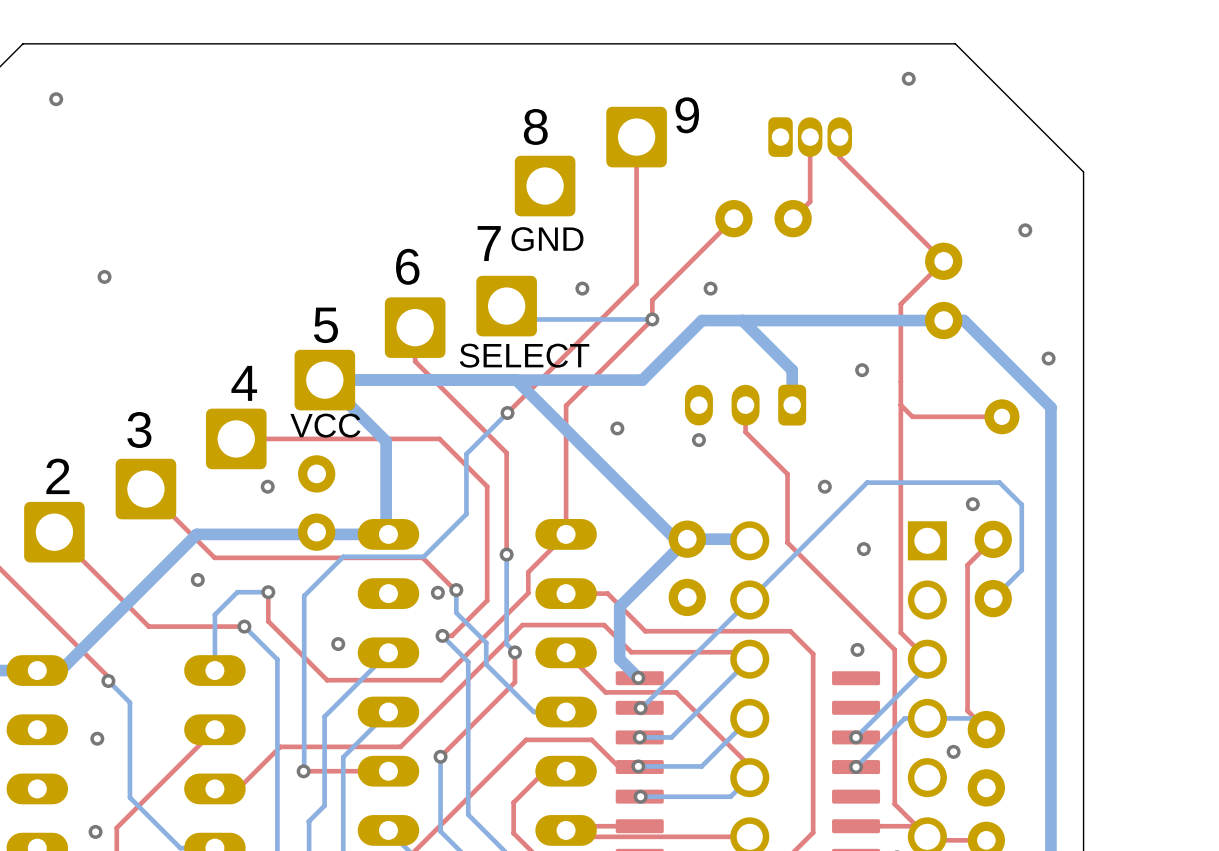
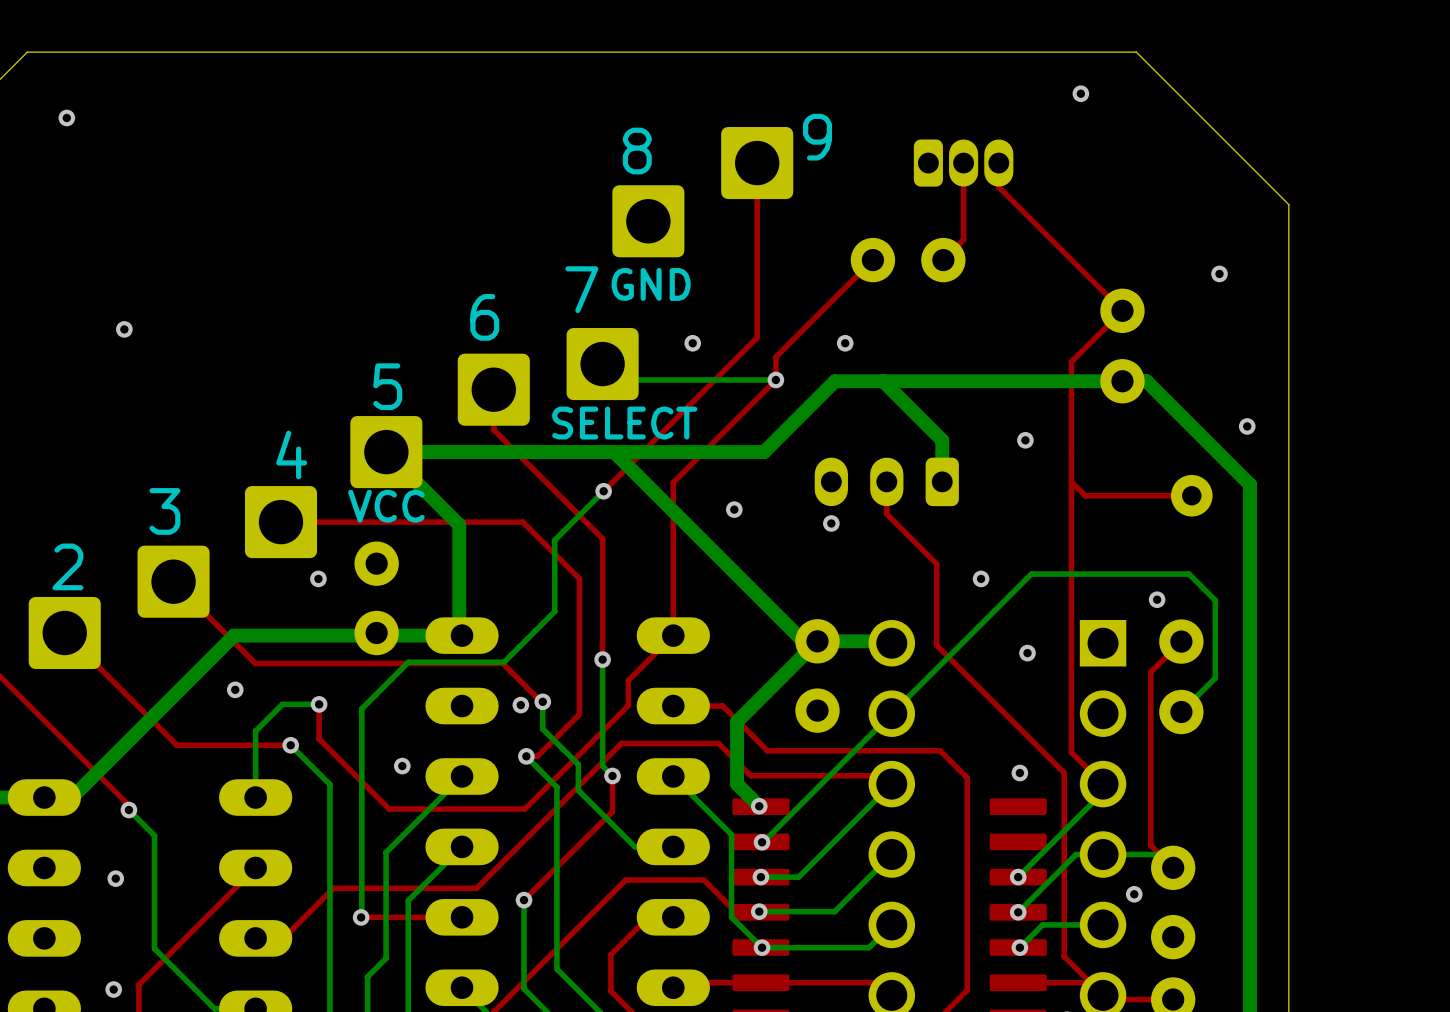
bottom track: none -> (673, 776) (731, 834) (731, 917) (762, 947)
top track: (566, 652) (605, 692) (676, 692) (749, 765) (749, 777) -> none
bottom track: none -> (1103, 924) (1042, 924) (1019, 947)
via: none -> (1019, 947)
top track: (749, 836) (577, 836) (570, 830) (566, 830) (572, 836) -> (891, 995) (879, 982) (760, 982)

